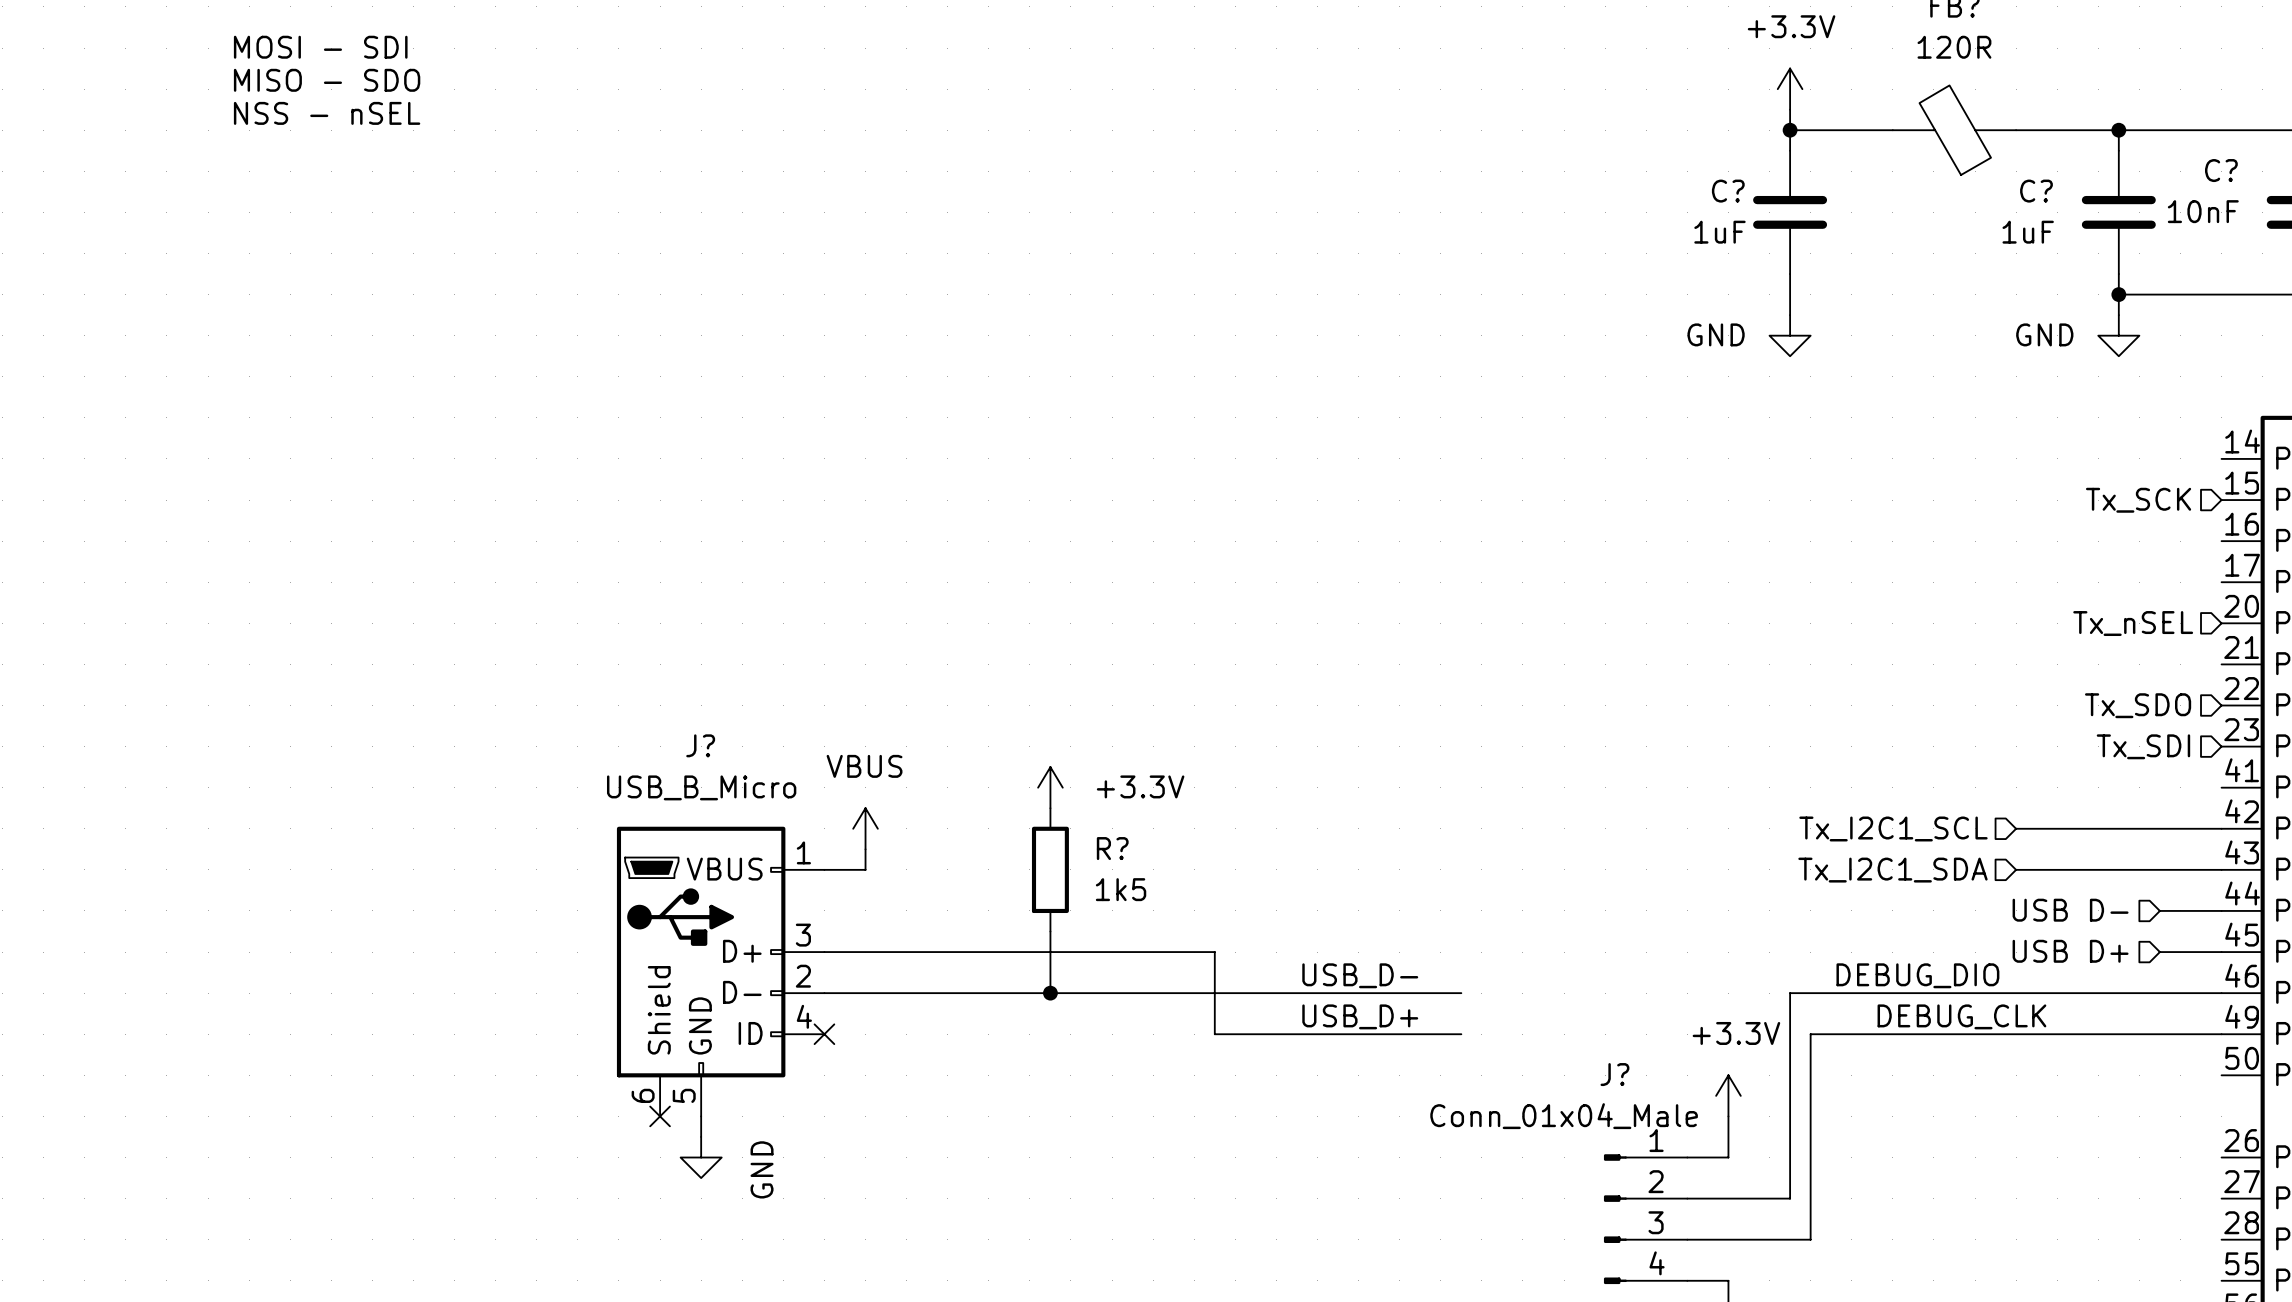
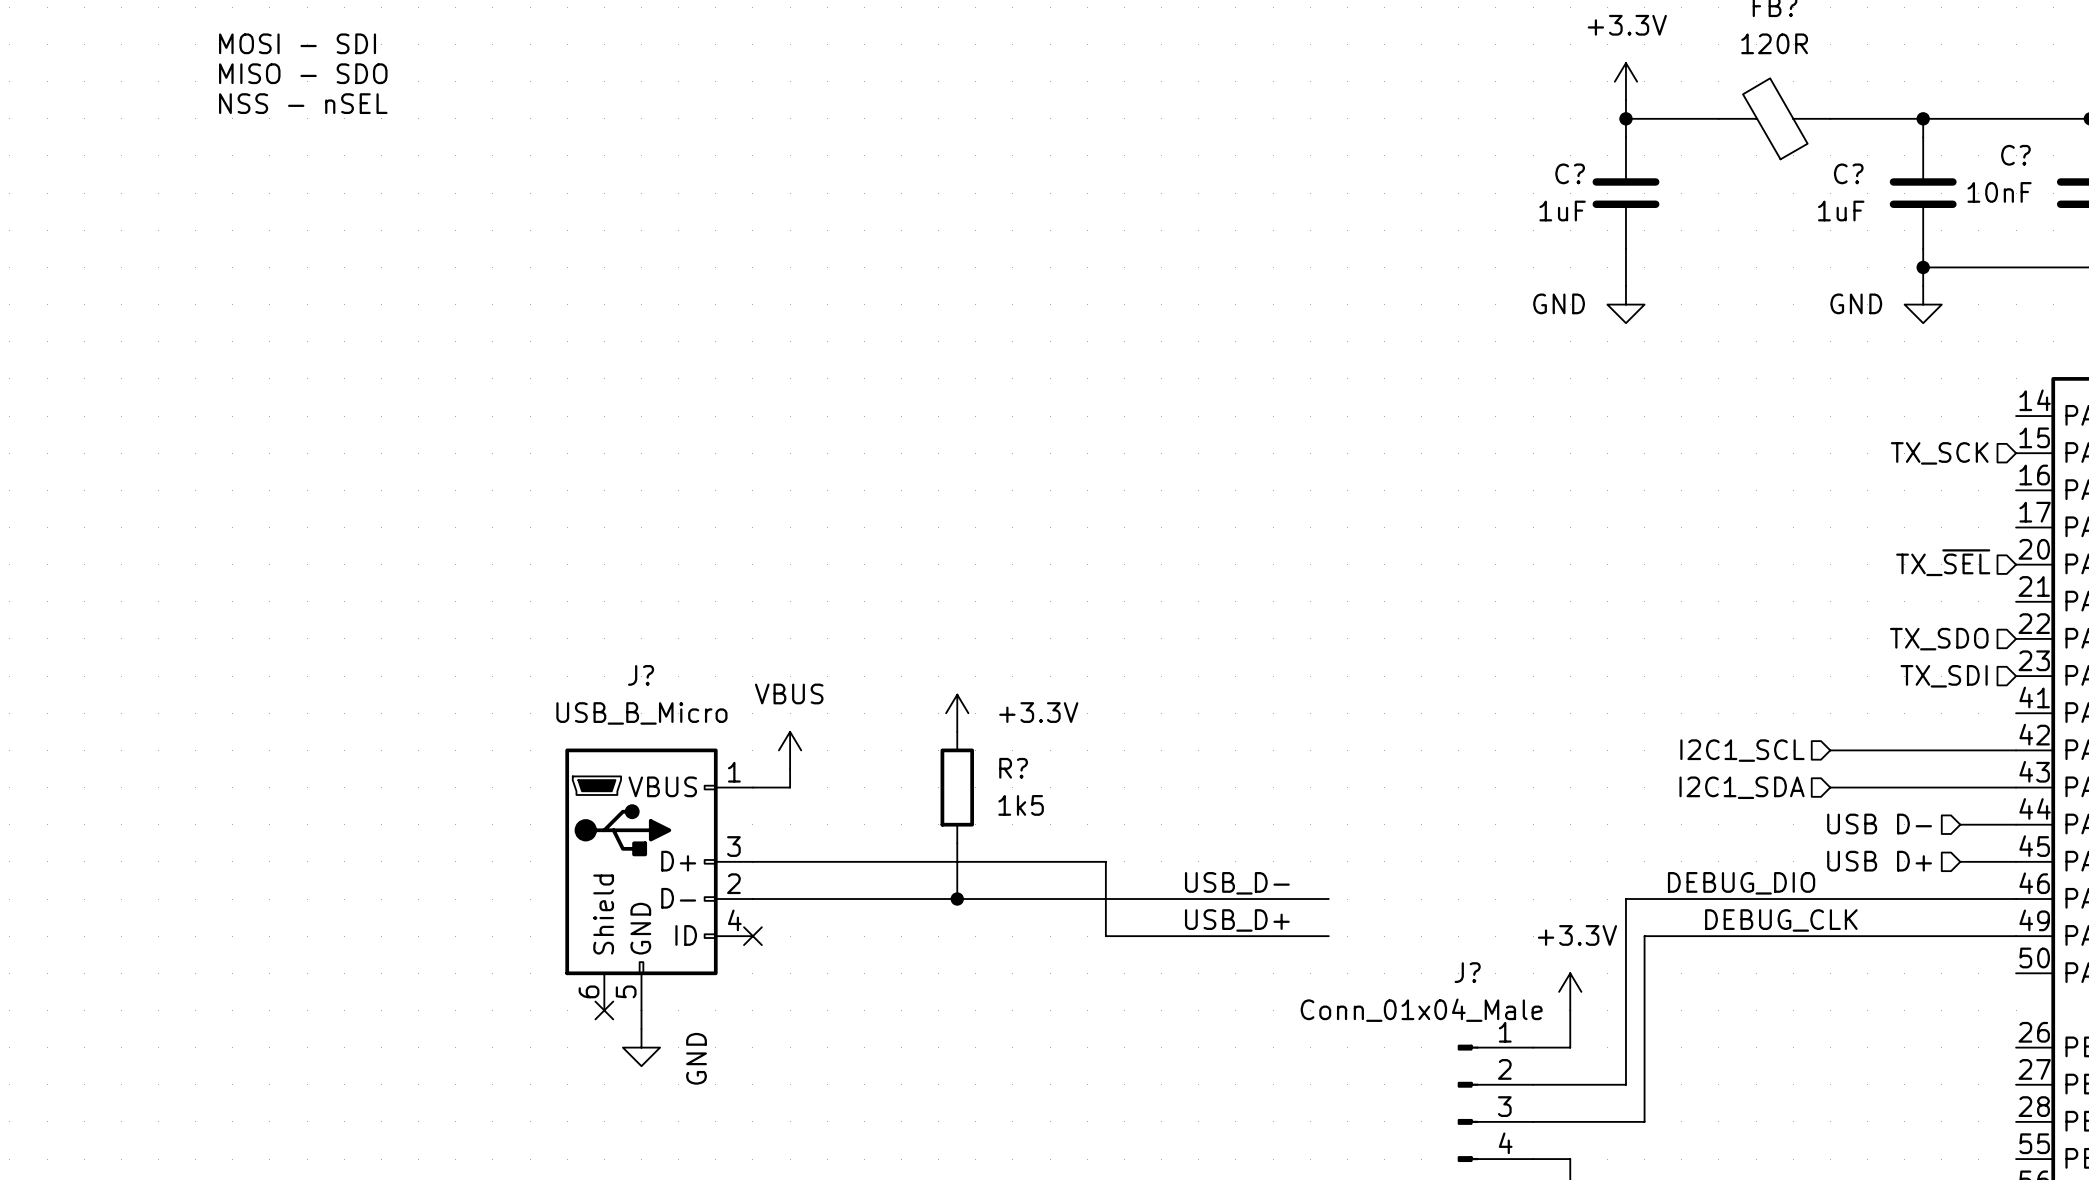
hierarchical label: Tx_SCK (2138, 500) -> TX_SCK (1939, 453)
hierarchical label: Tx_nSEL (2133, 623) -> TX_~{SEL} (1943, 562)
hierarchical label: Tx_SDO (2138, 705) -> TX_SDO (1939, 639)
hierarchical label: Tx_SDI (2143, 746) -> TX_SDI (1944, 676)
hierarchical label: Tx_I2C1_SCL (1893, 828) -> I2C1_SCL (1742, 750)
hierarchical label: Tx_I2C1_SDA (1892, 870) -> I2C1_SDA (1742, 787)

